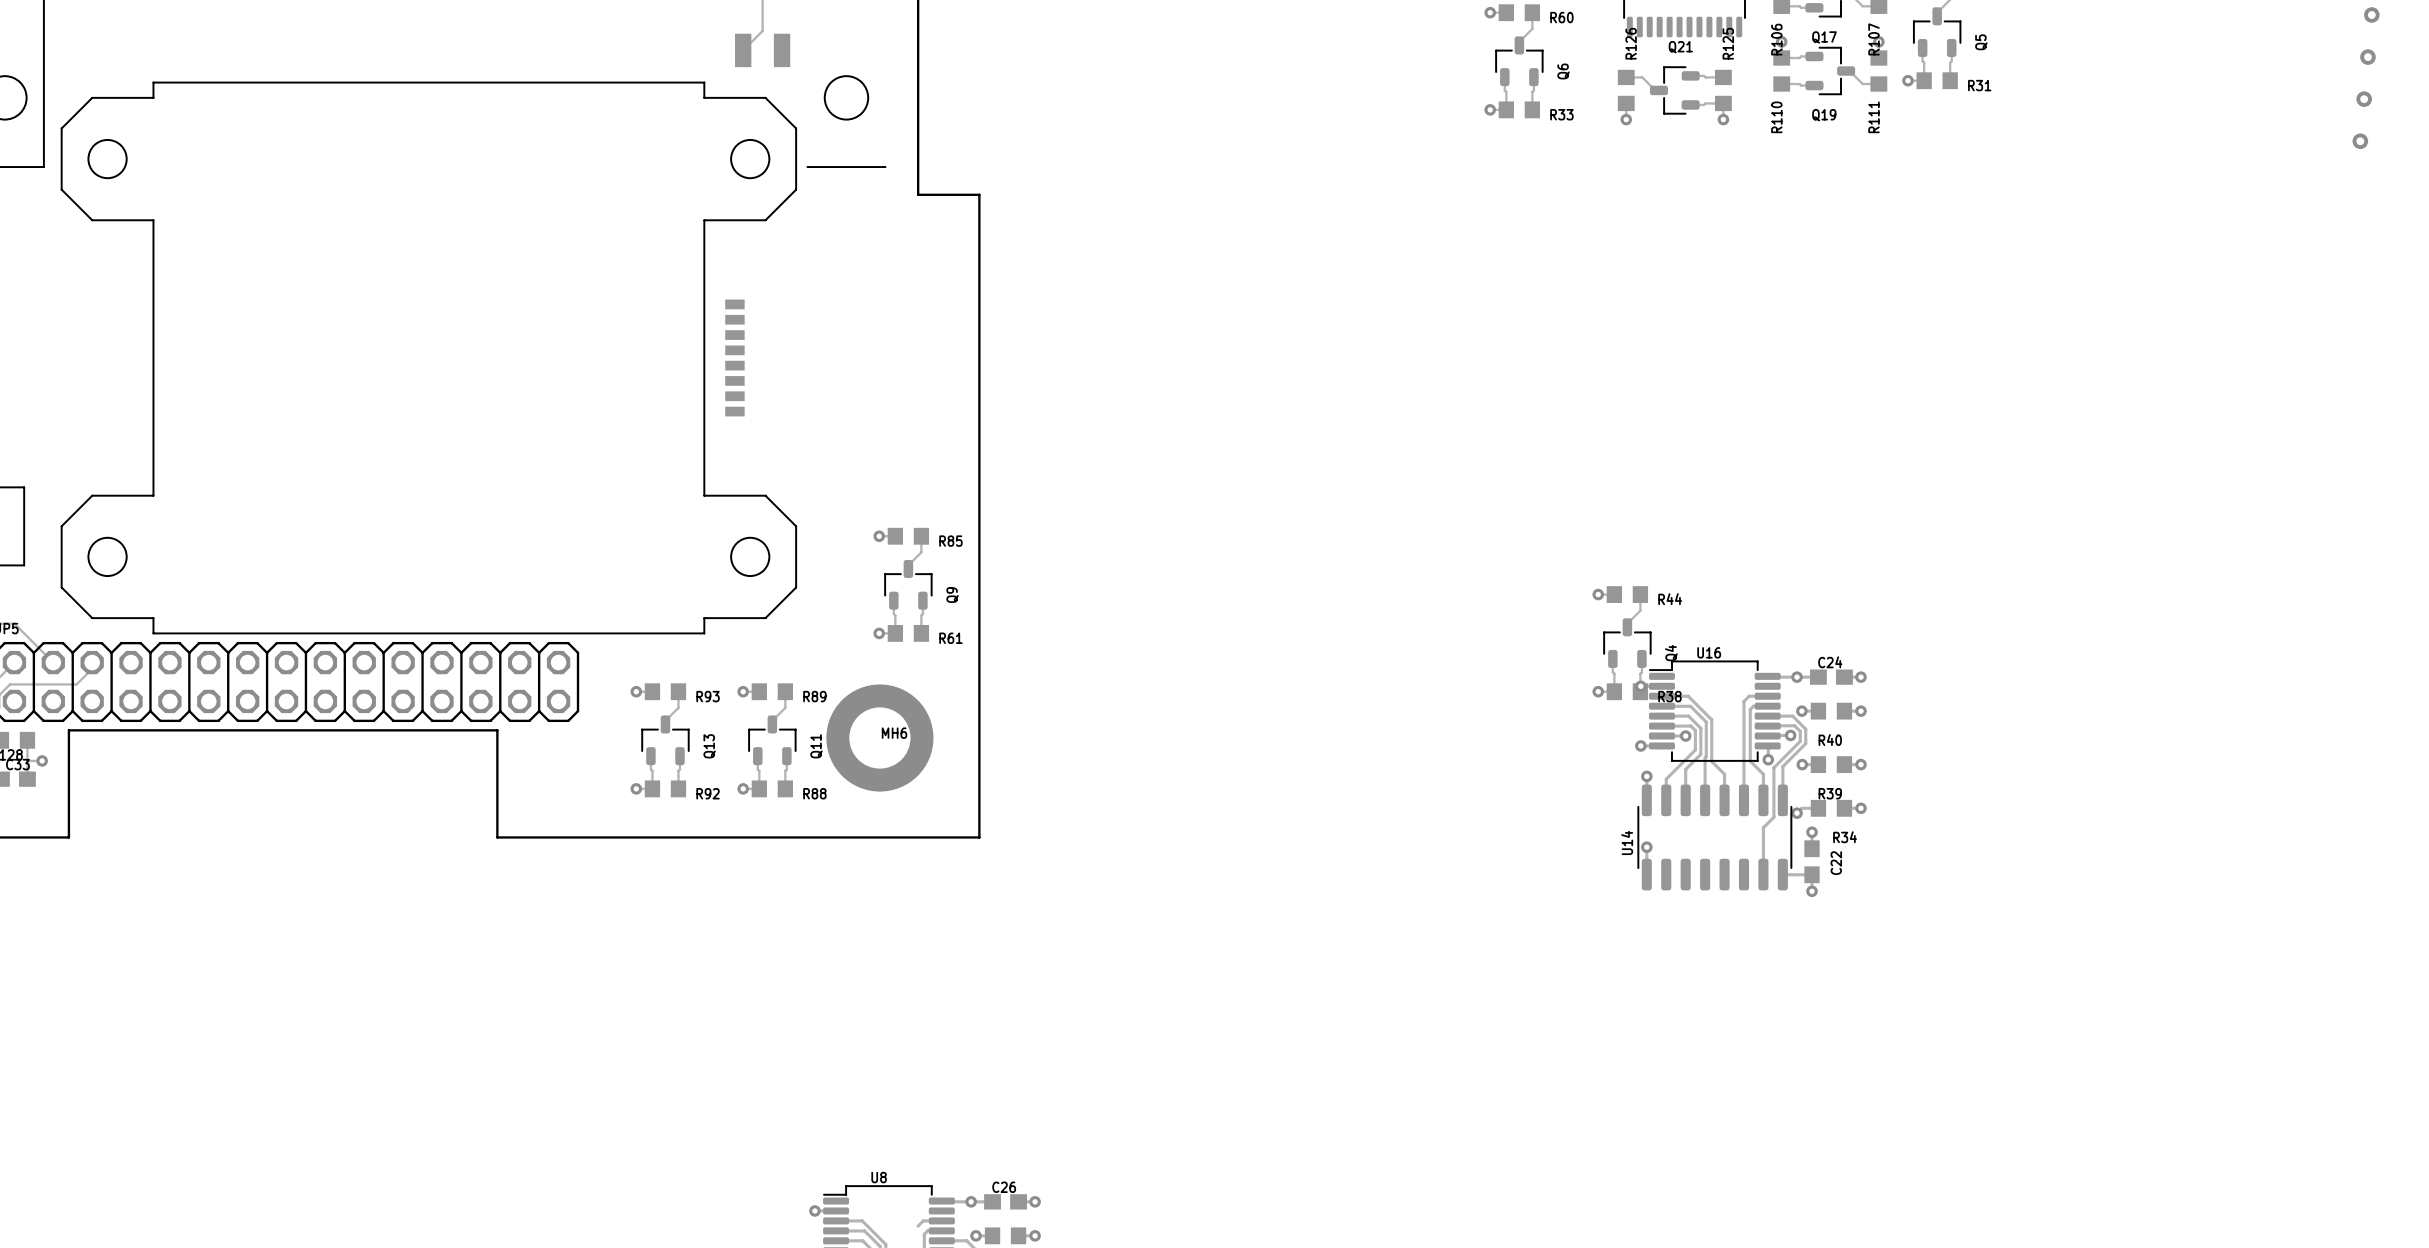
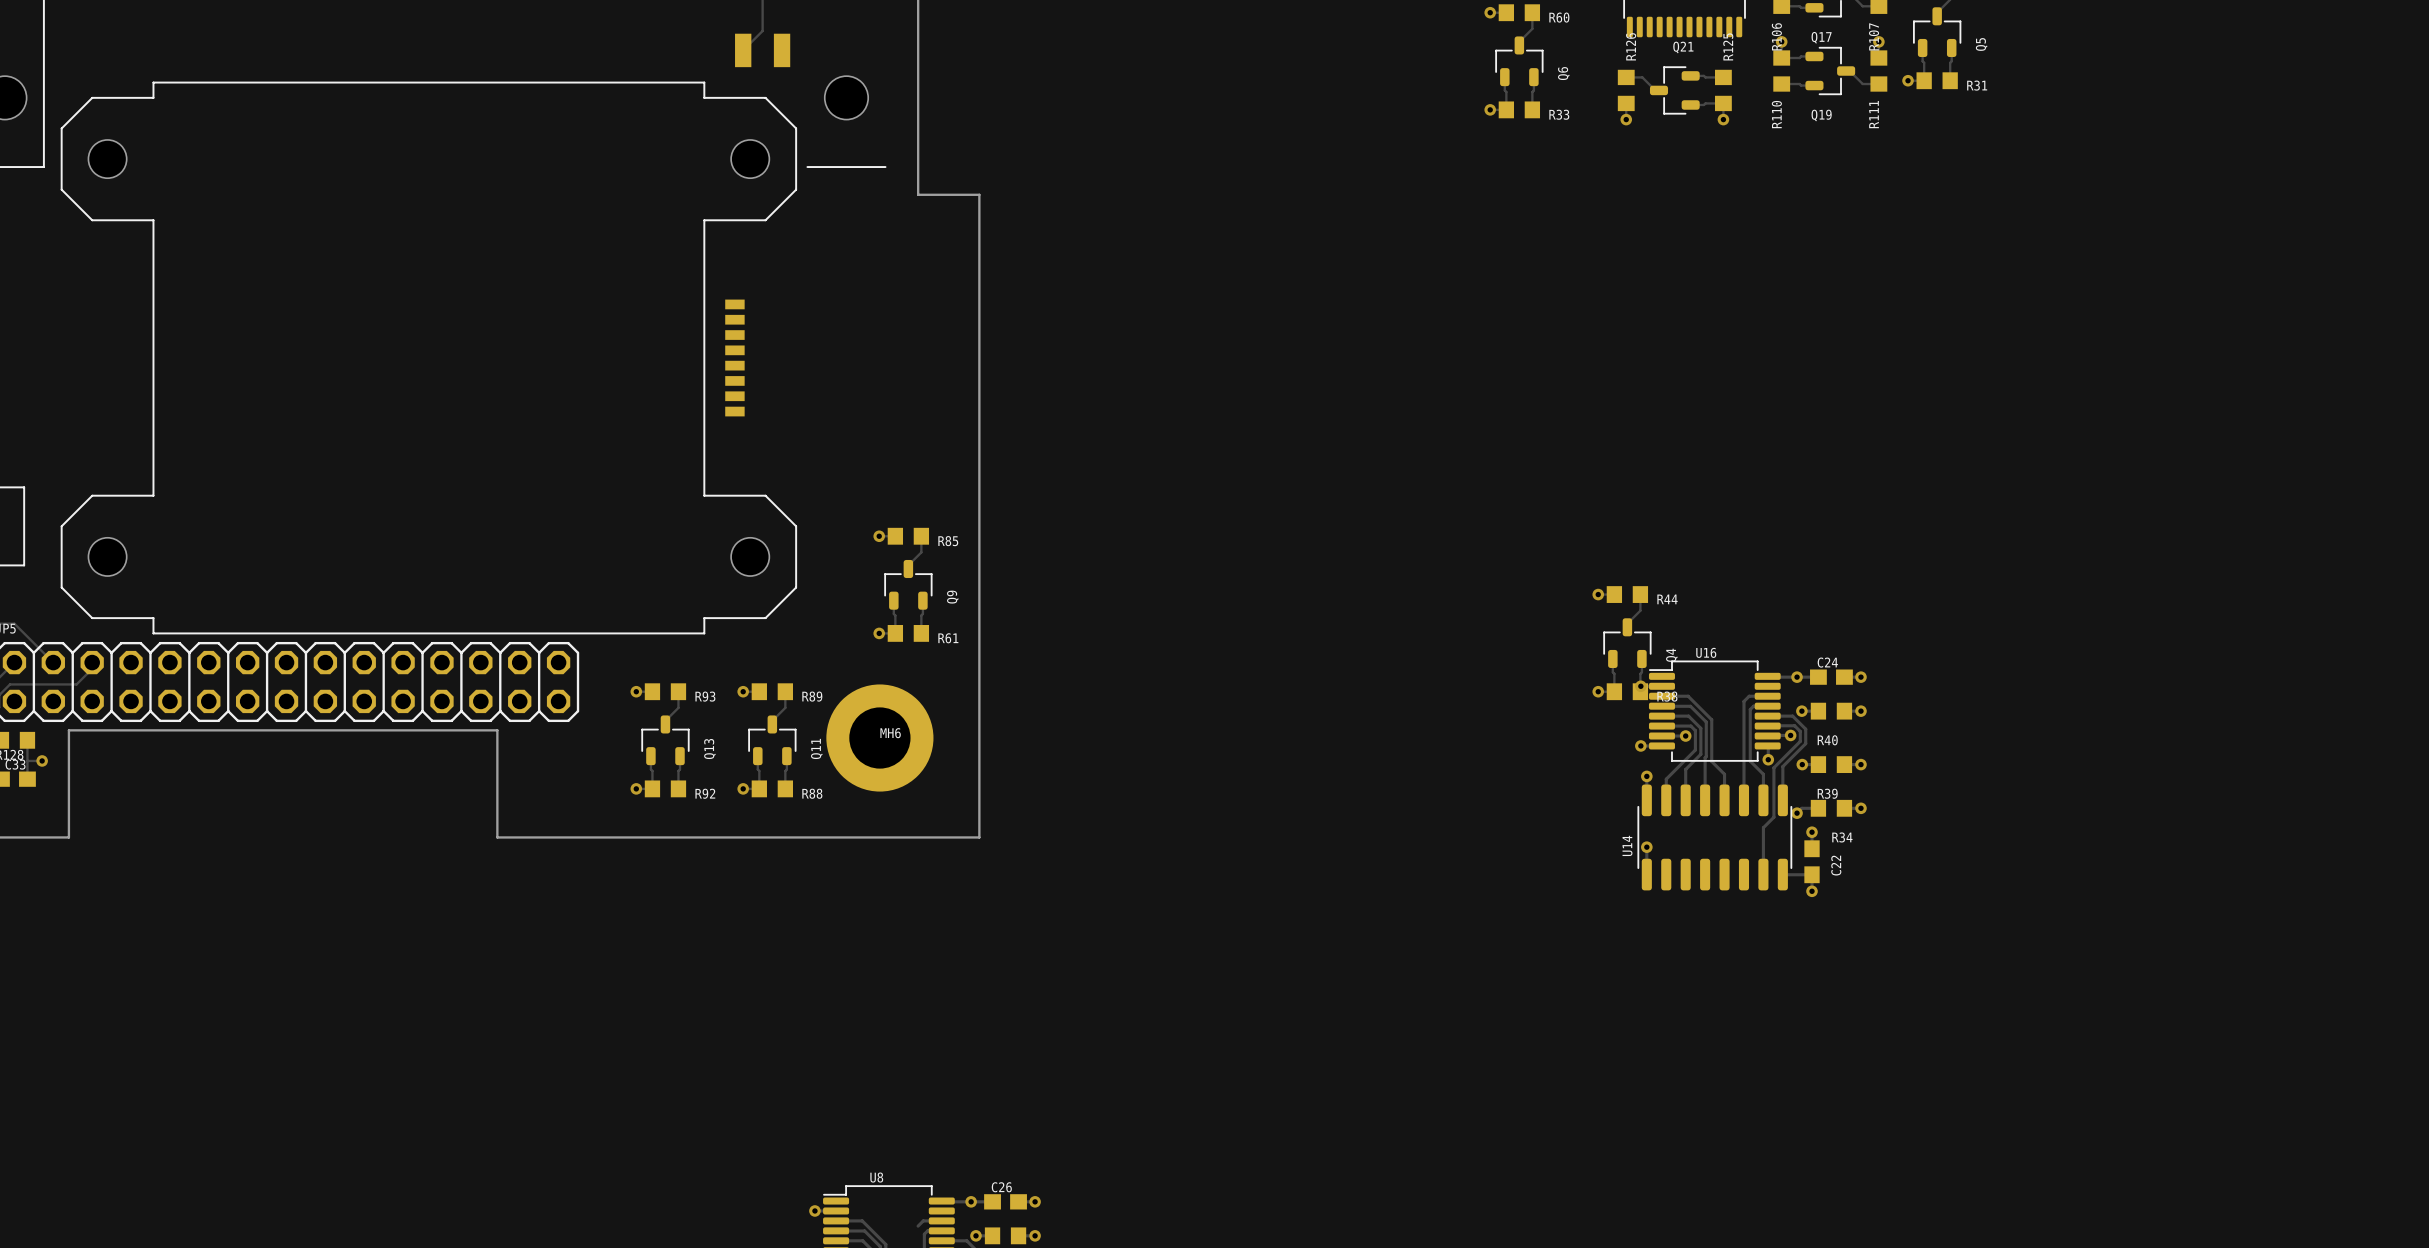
part: (2371, 15) -> none
part: (2367, 57) -> none
part: (2364, 99) -> none
part: (2360, 141) -> none

